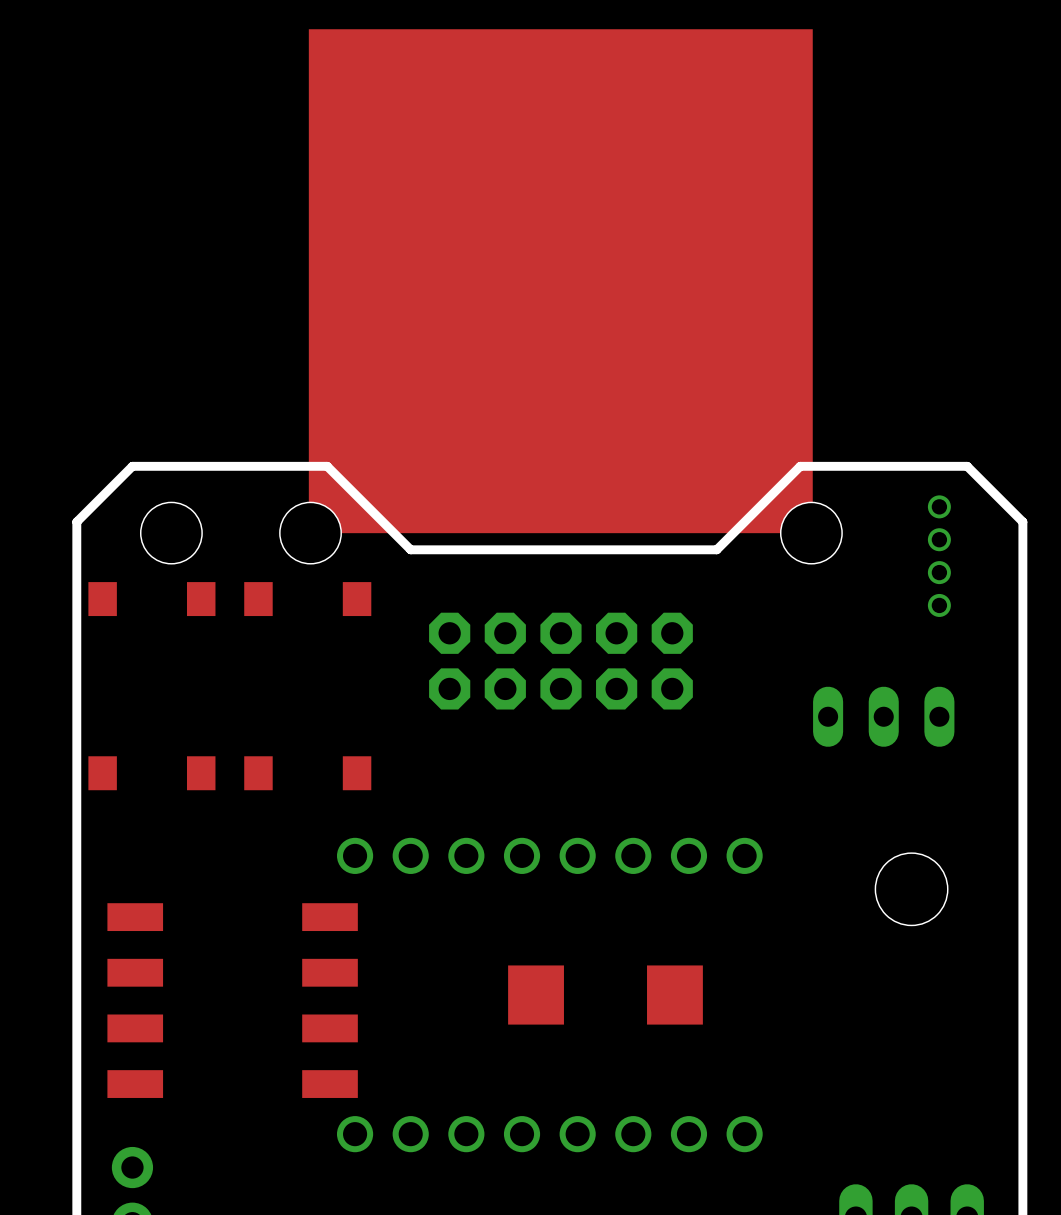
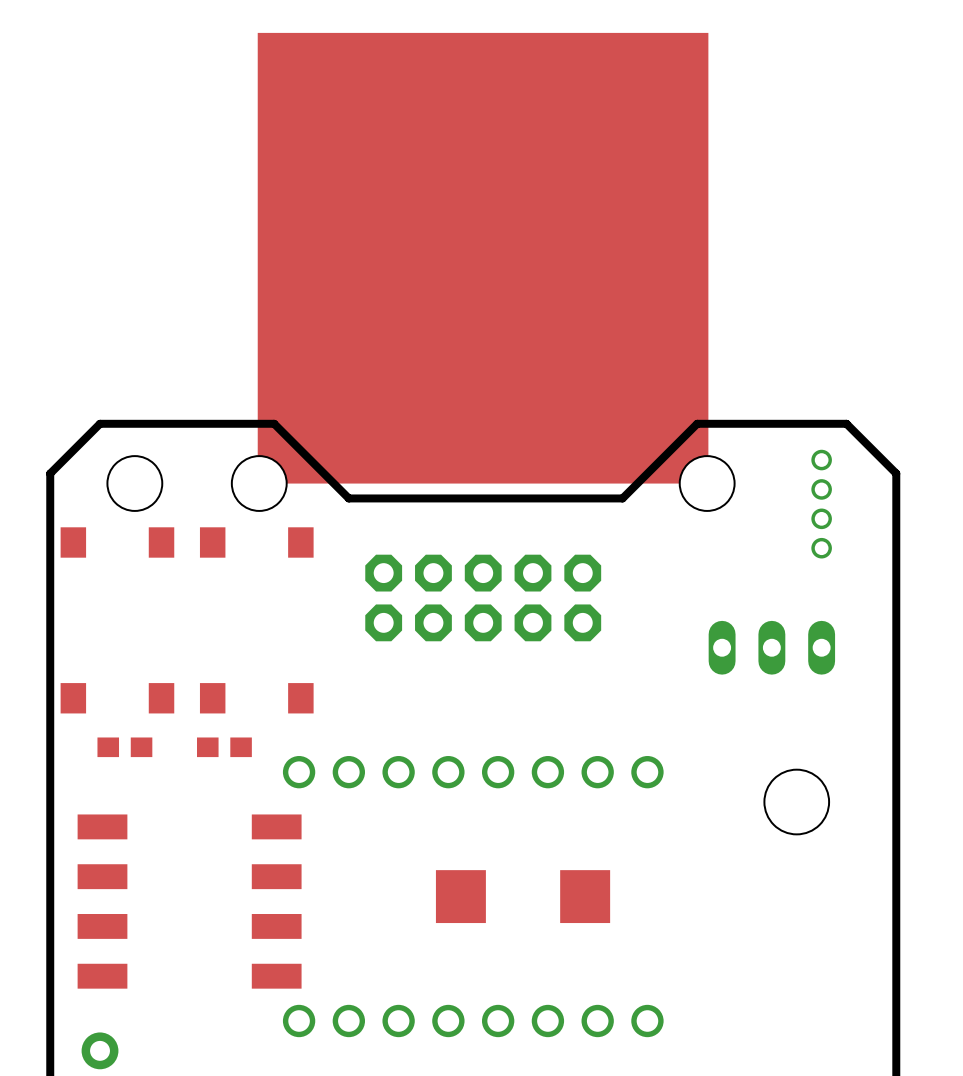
part: none -> (124, 747)
part: none -> (224, 747)

